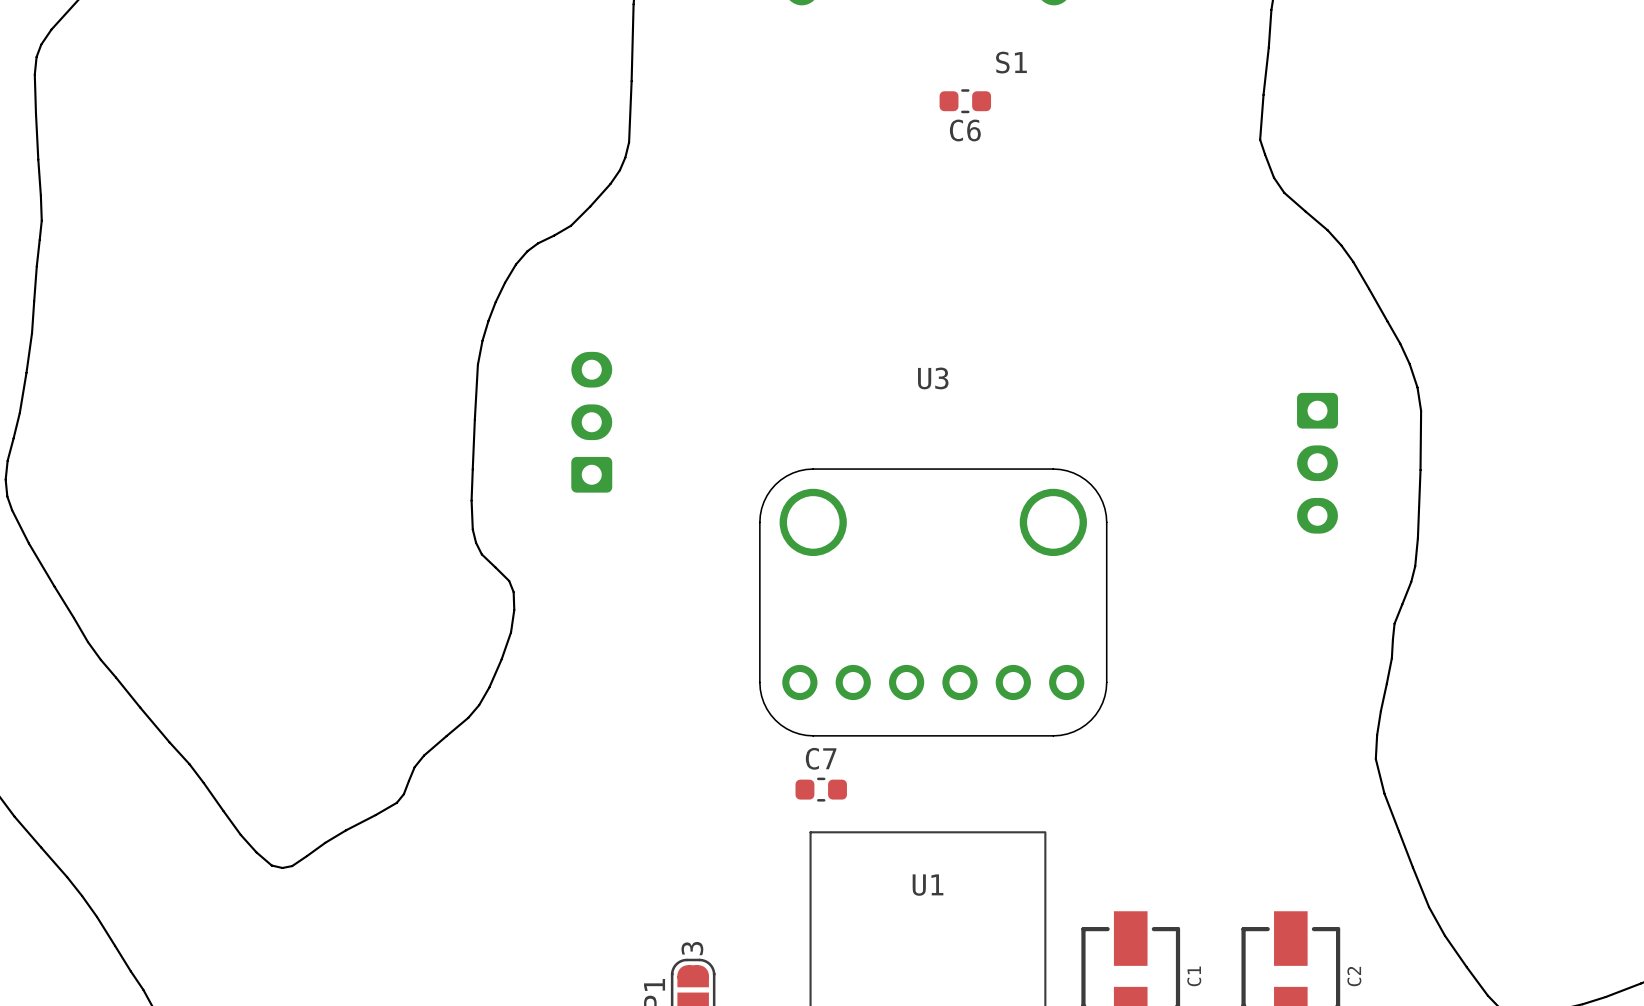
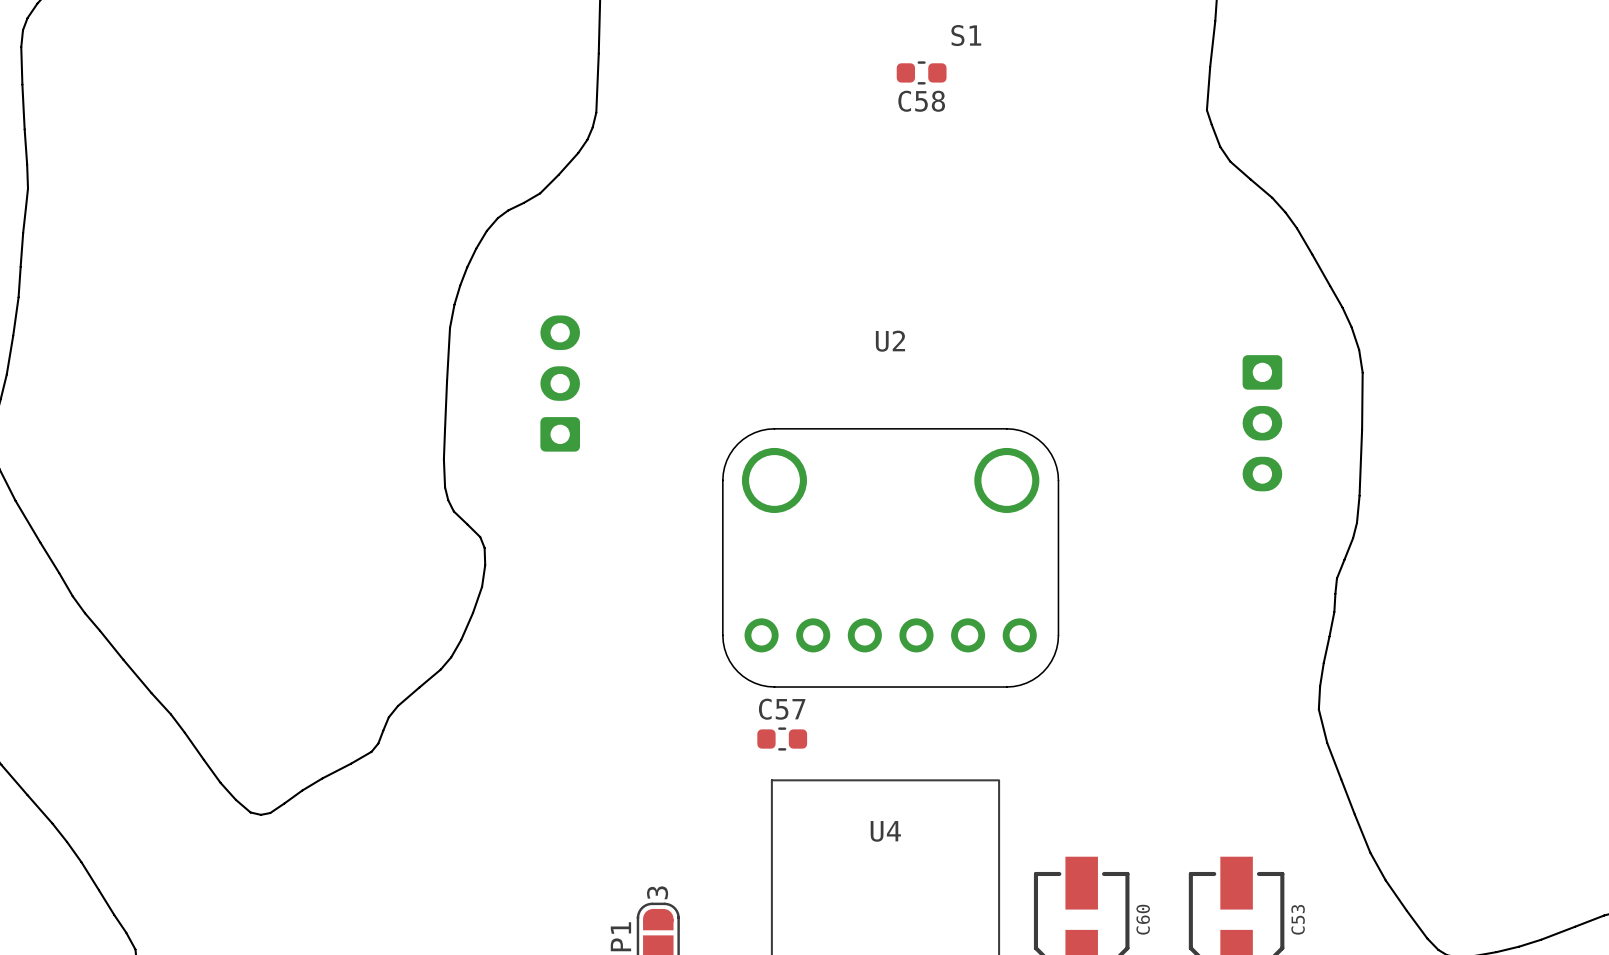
C6 name: C6 (965, 130) -> C58 (921, 101)
U3 name: U3 (933, 378) -> U2 (890, 341)
C7 name: C7 (821, 758) -> C57 (782, 709)
U1 name: U1 (928, 885) -> U4 (885, 831)
C1 name: C1 (1194, 976) -> C60 (1143, 919)
C2 name: C2 (1354, 976) -> C53 (1298, 919)

